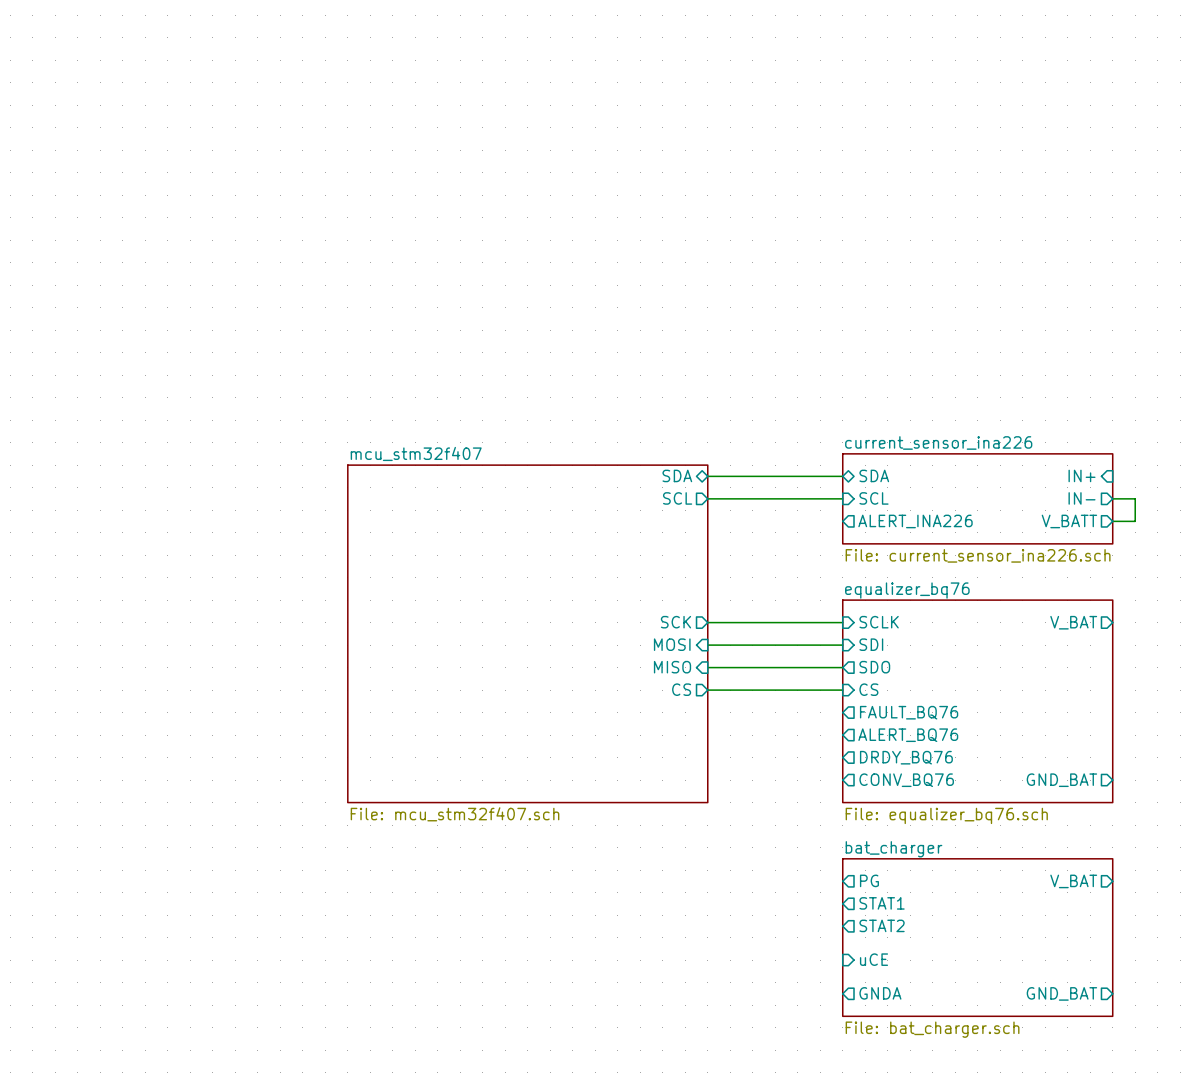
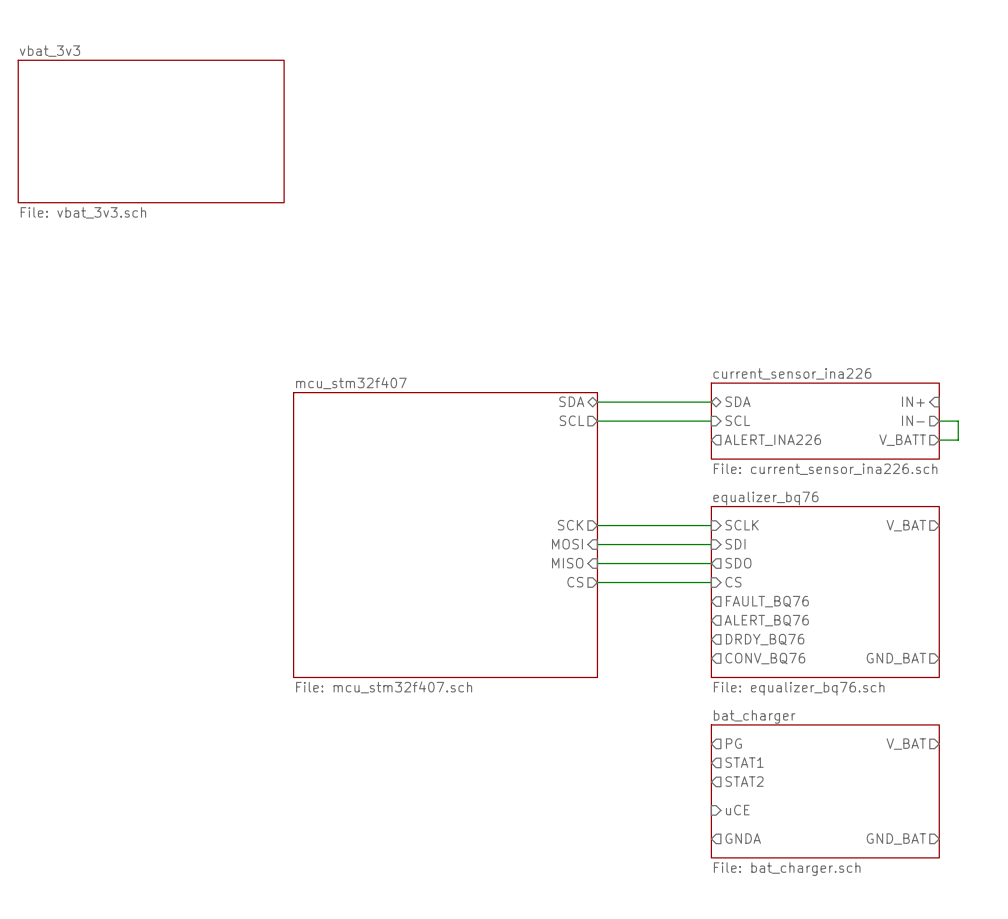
sheet vbat_3v3: none -> File: vbat_3v3.sch (151, 131)

